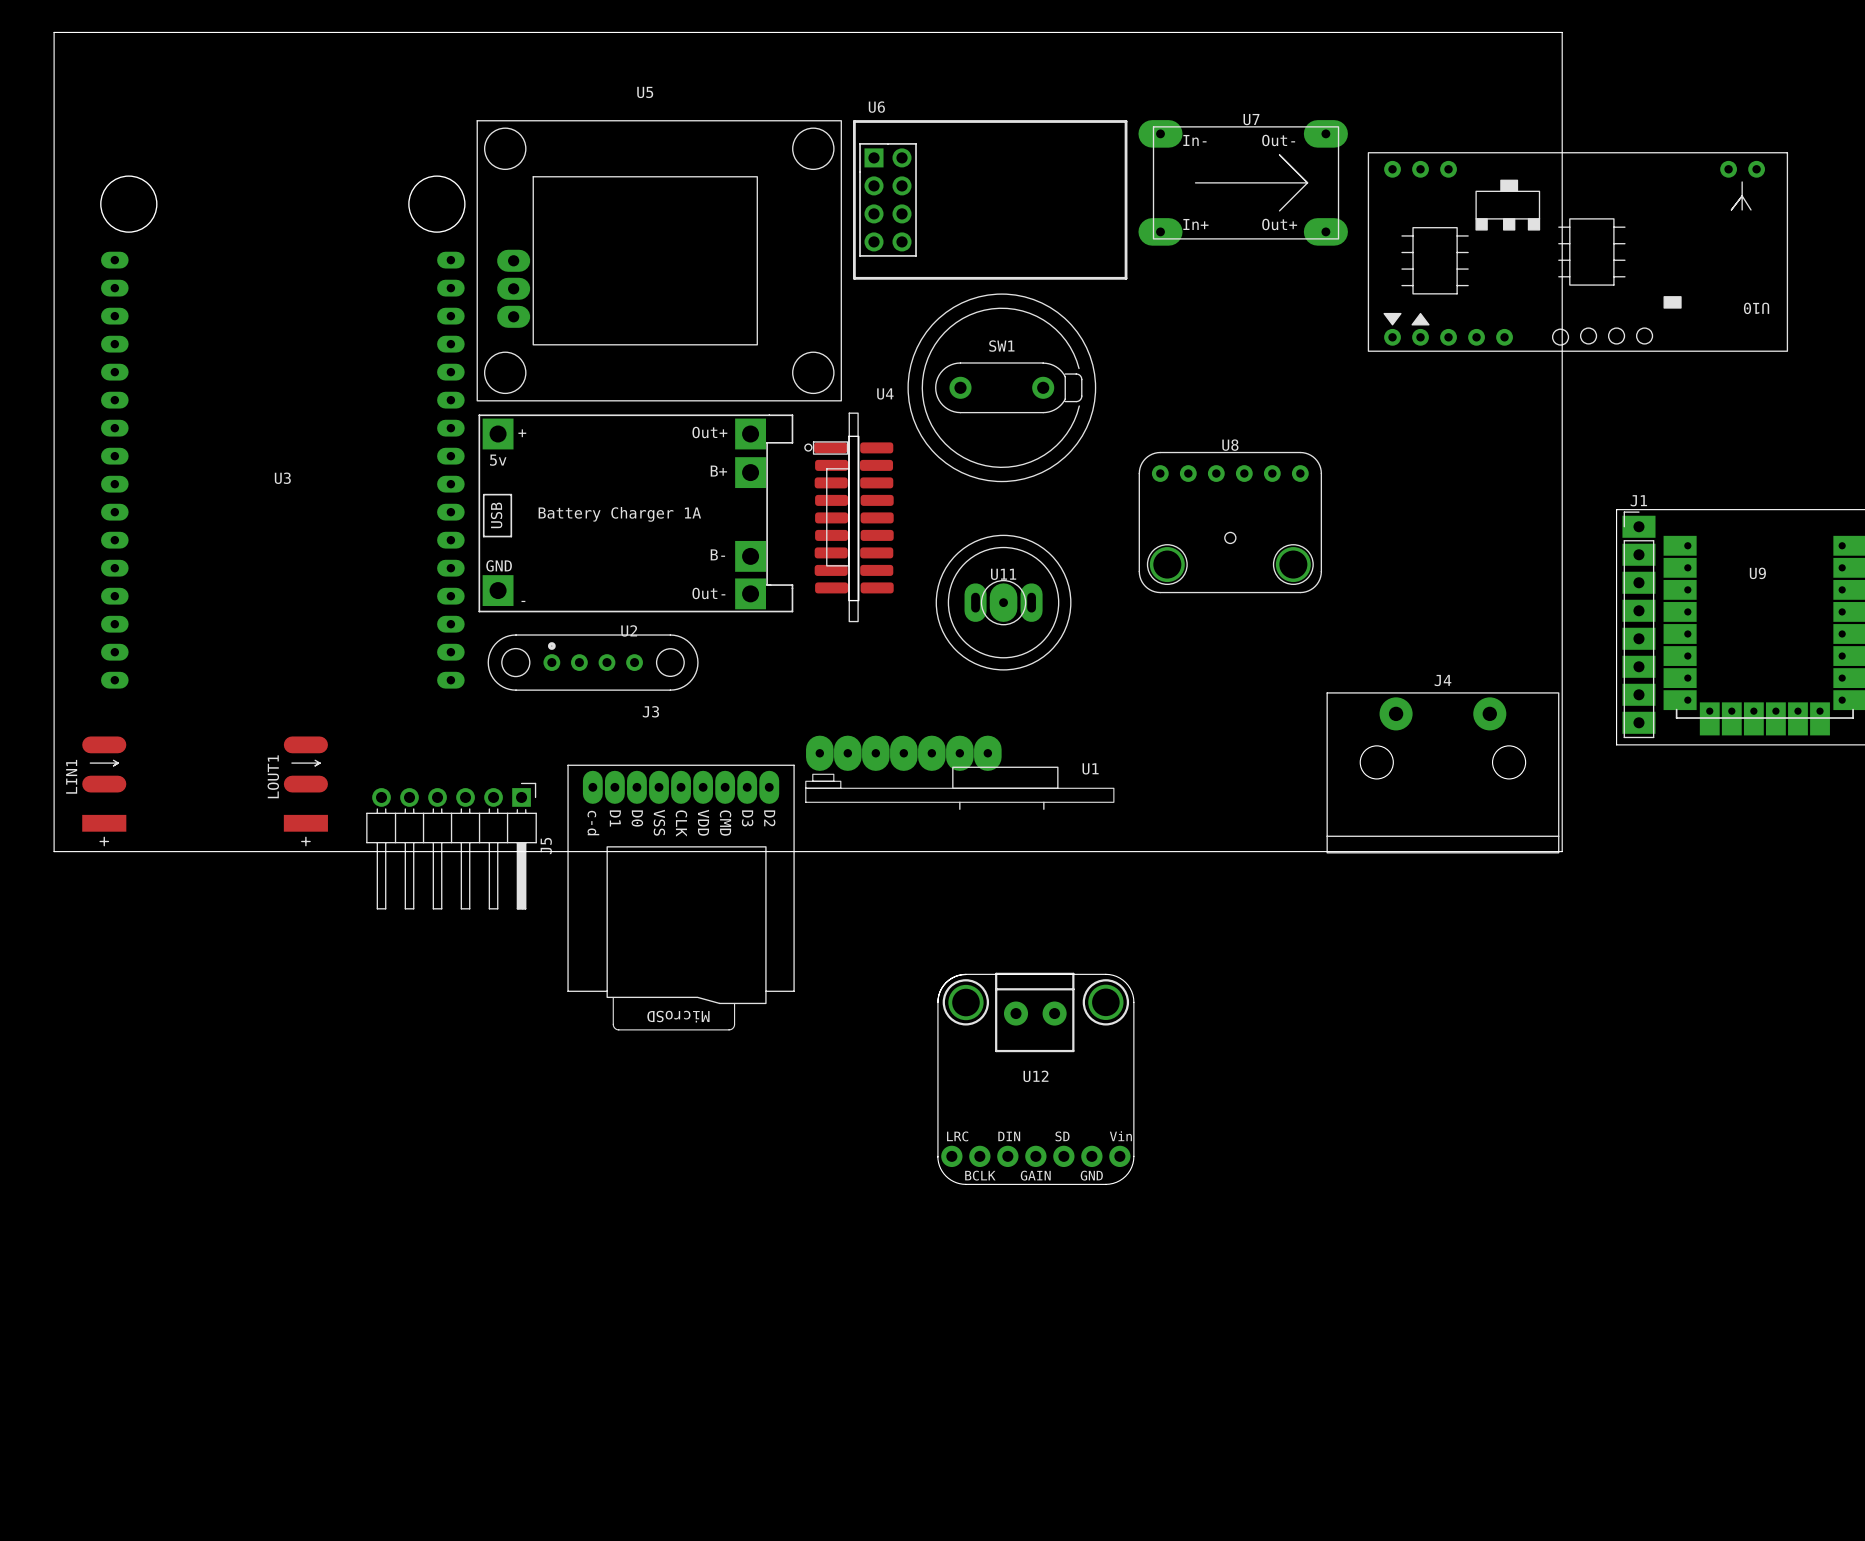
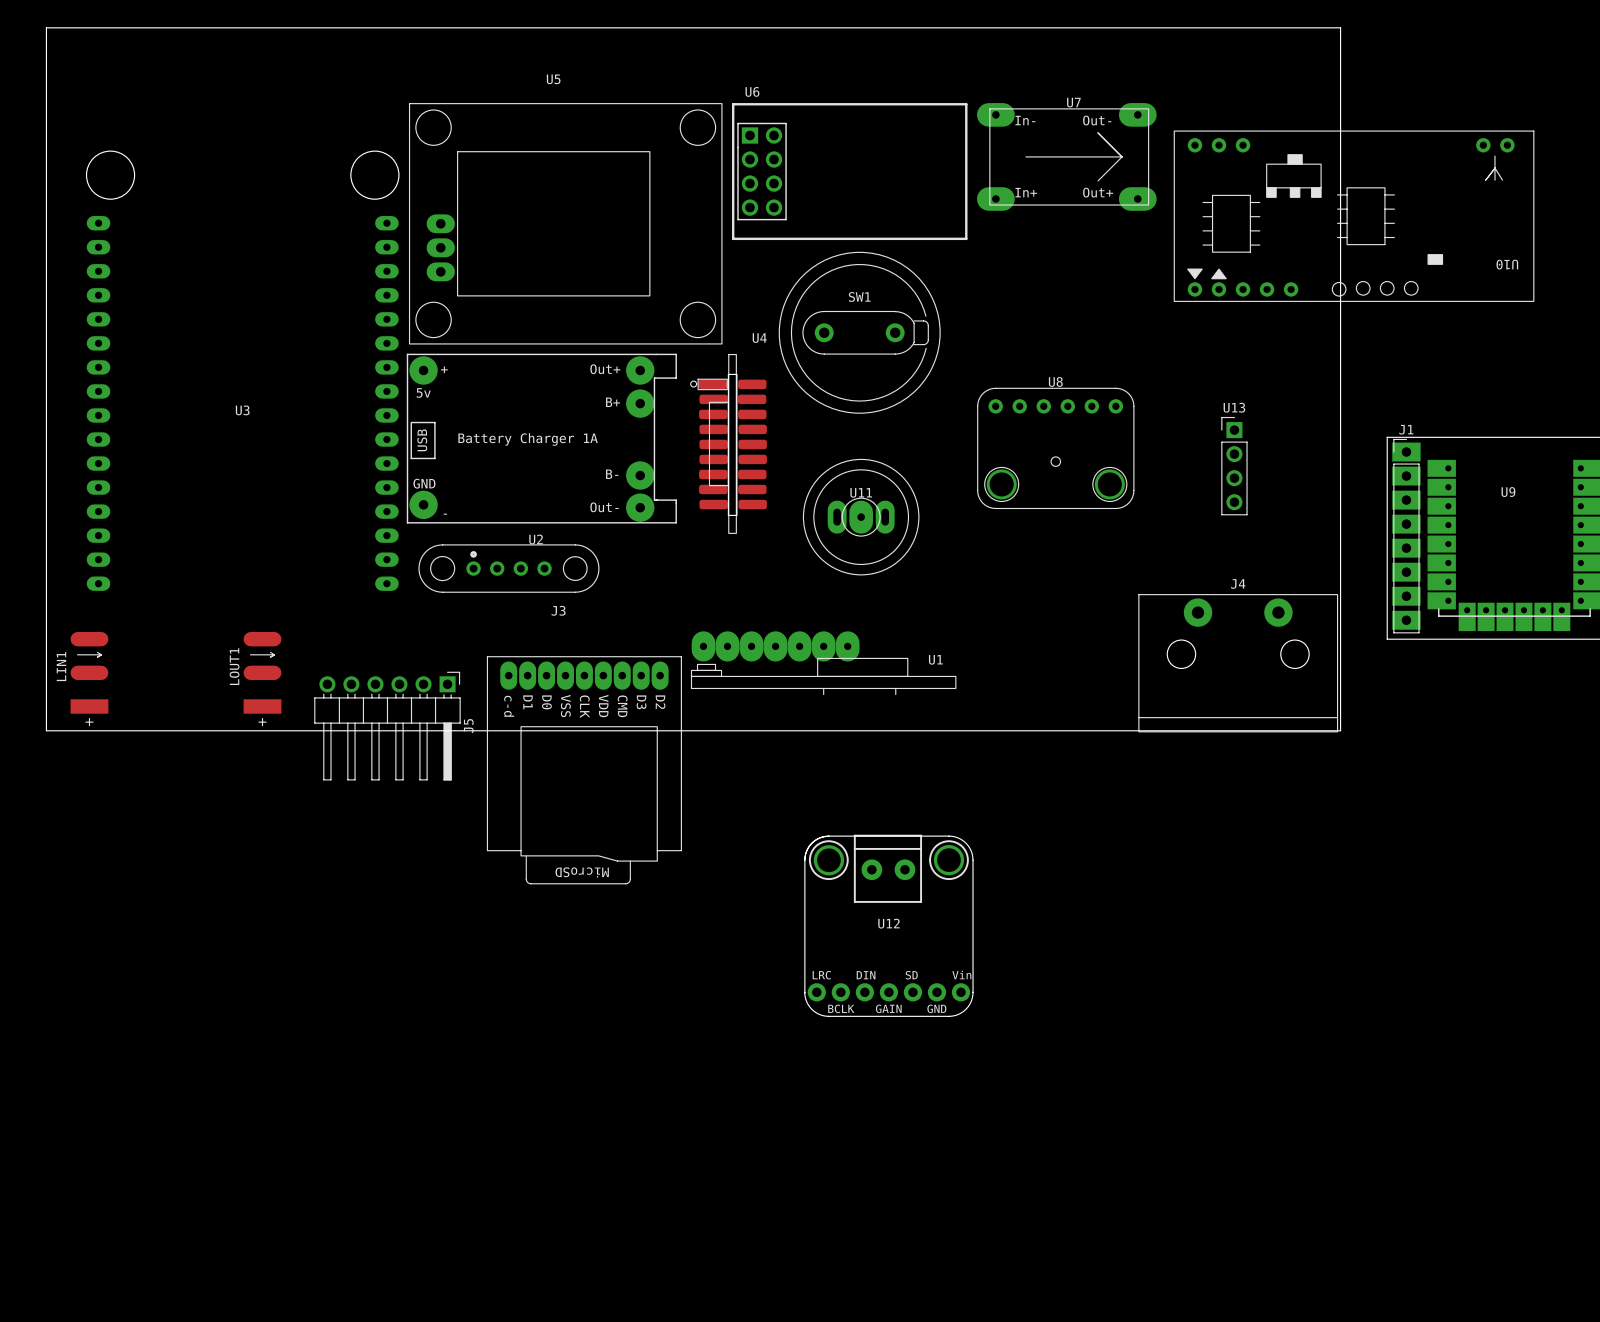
U2 footprint: [478, 414, 794, 613] -> [406, 353, 677, 524]
U13: none -> (1234, 466)

